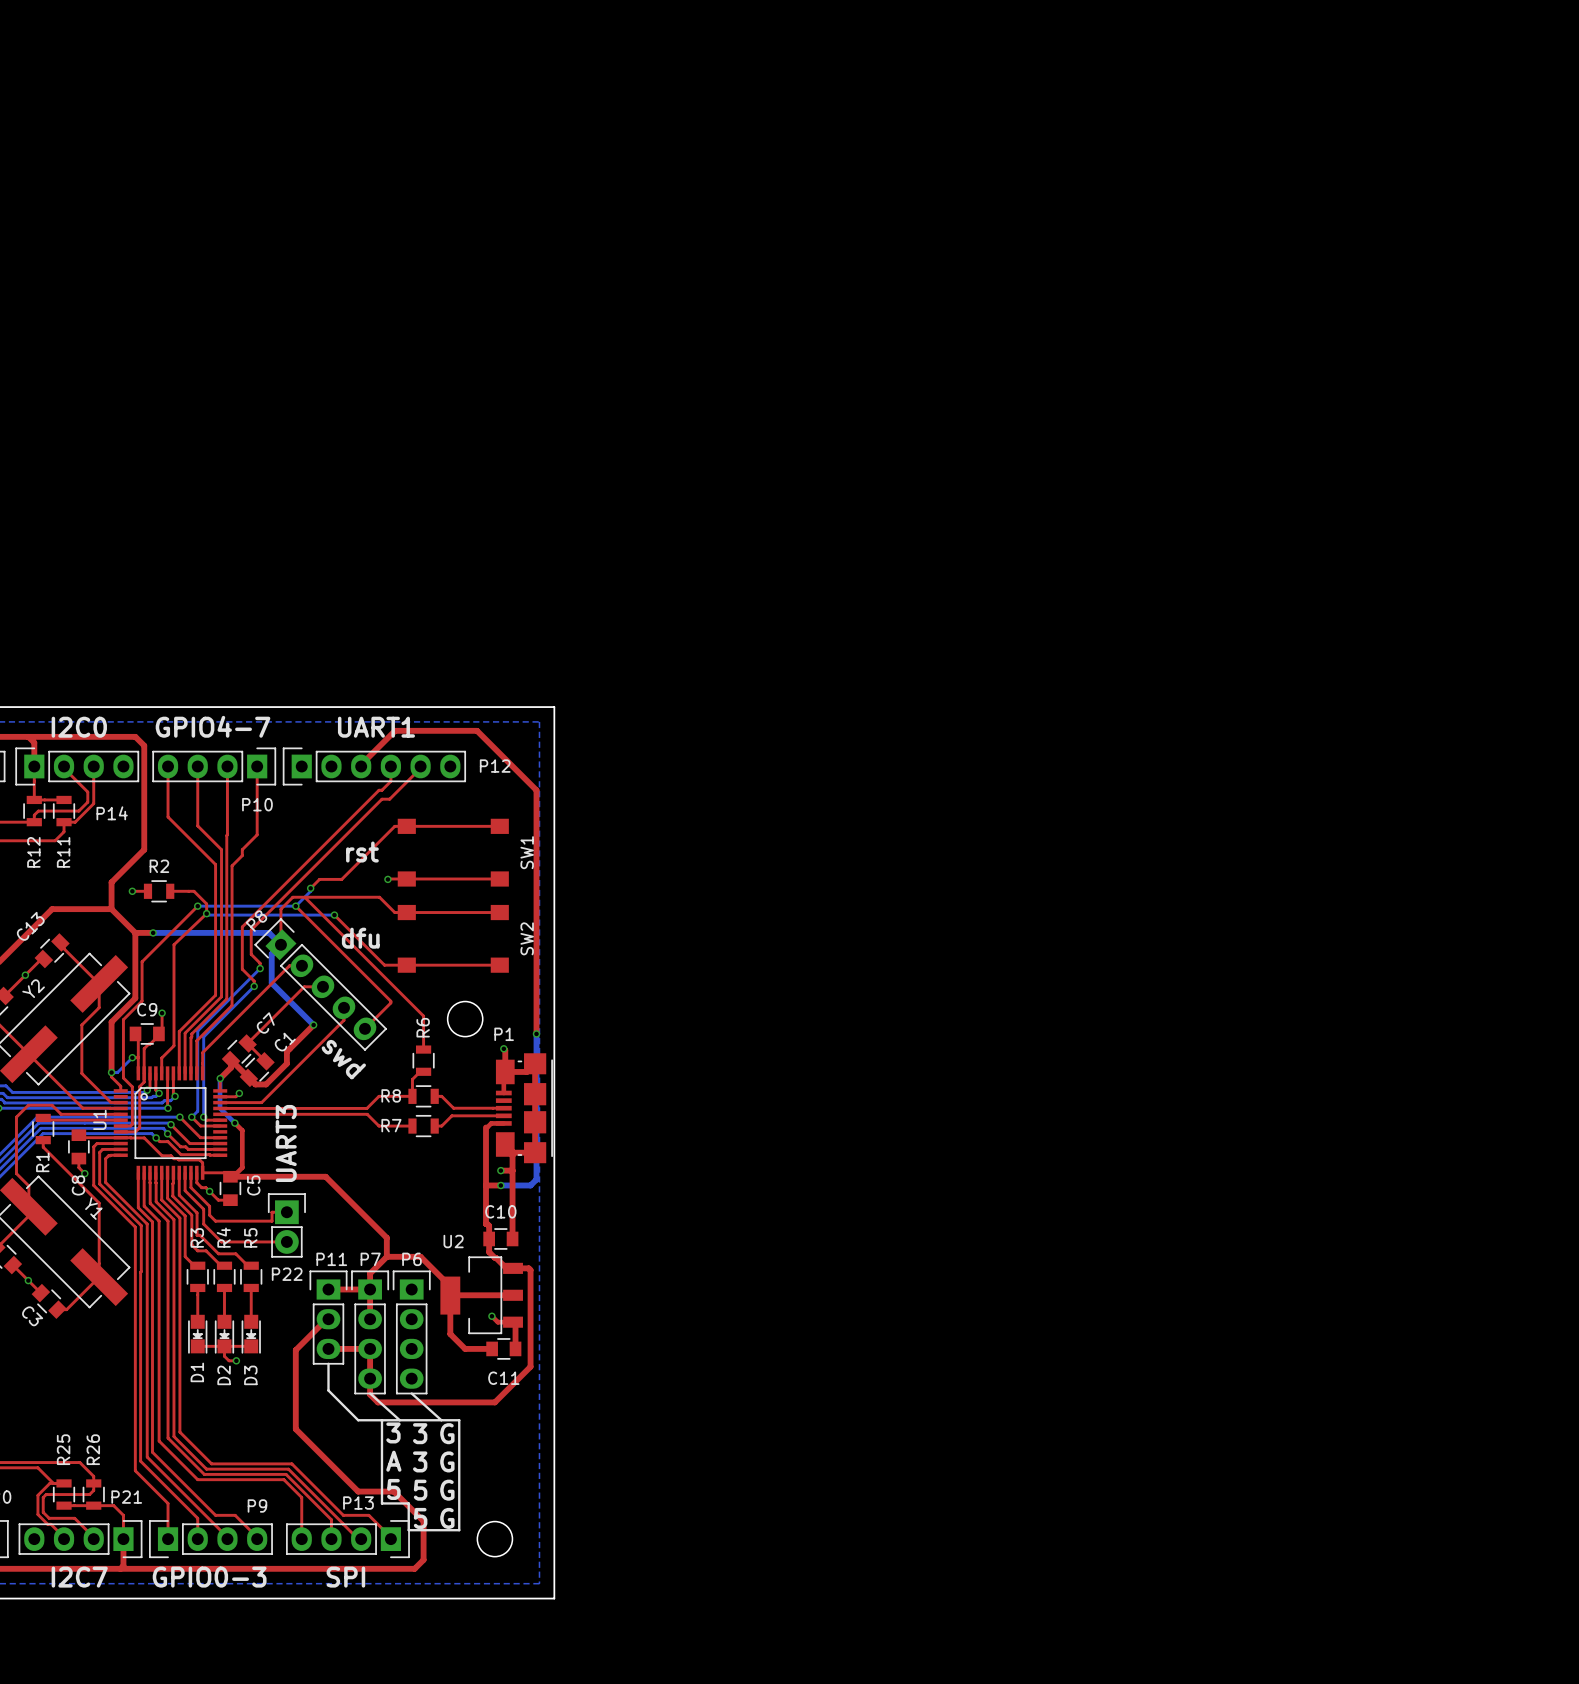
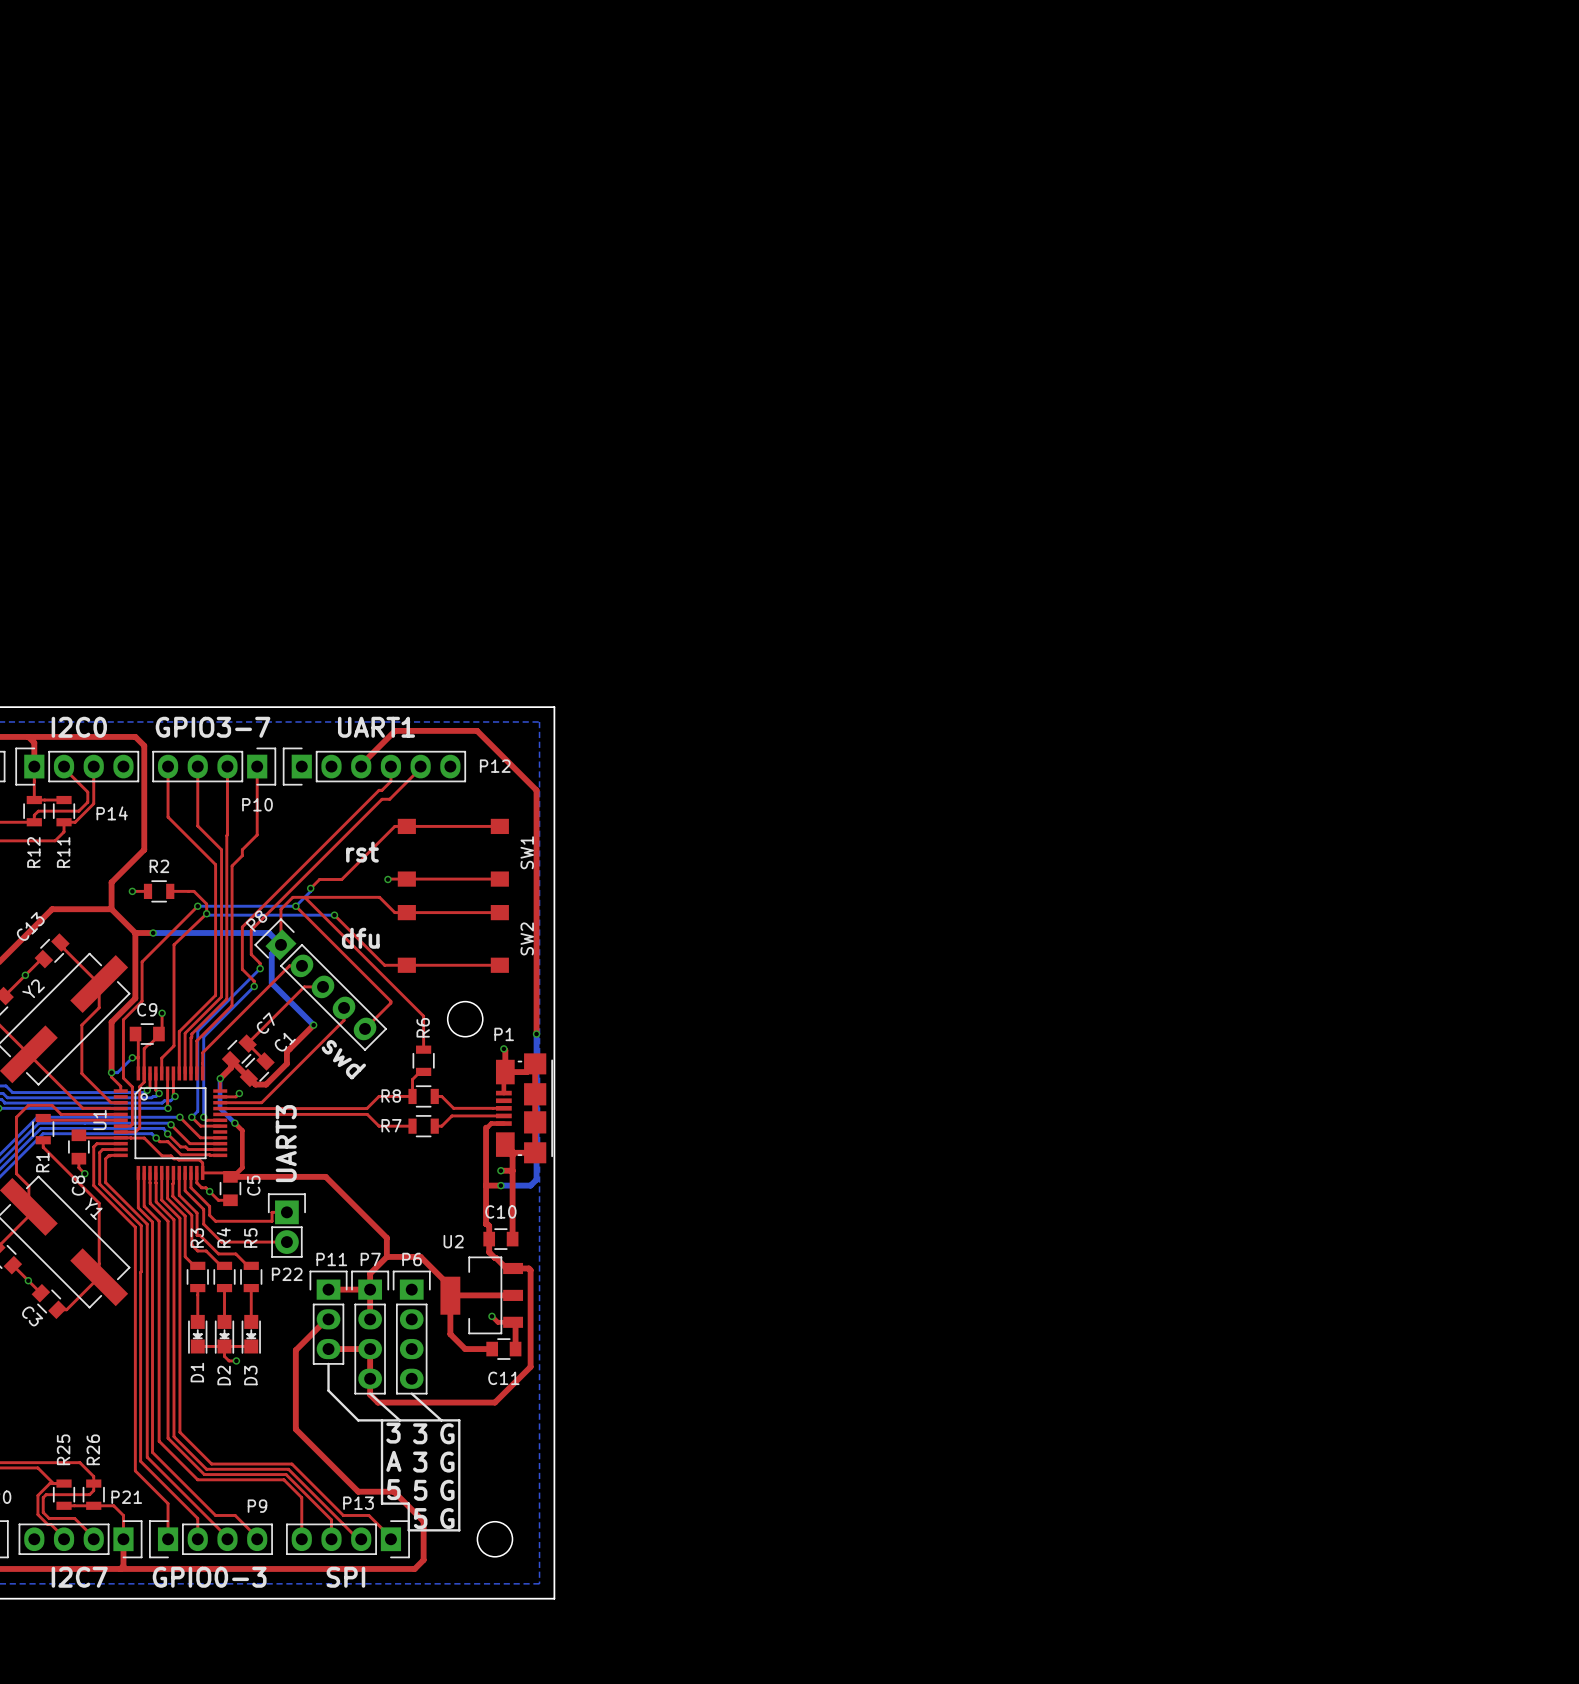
text: GPIO4-7 (213, 726) -> GPIO3-7 (213, 727)

